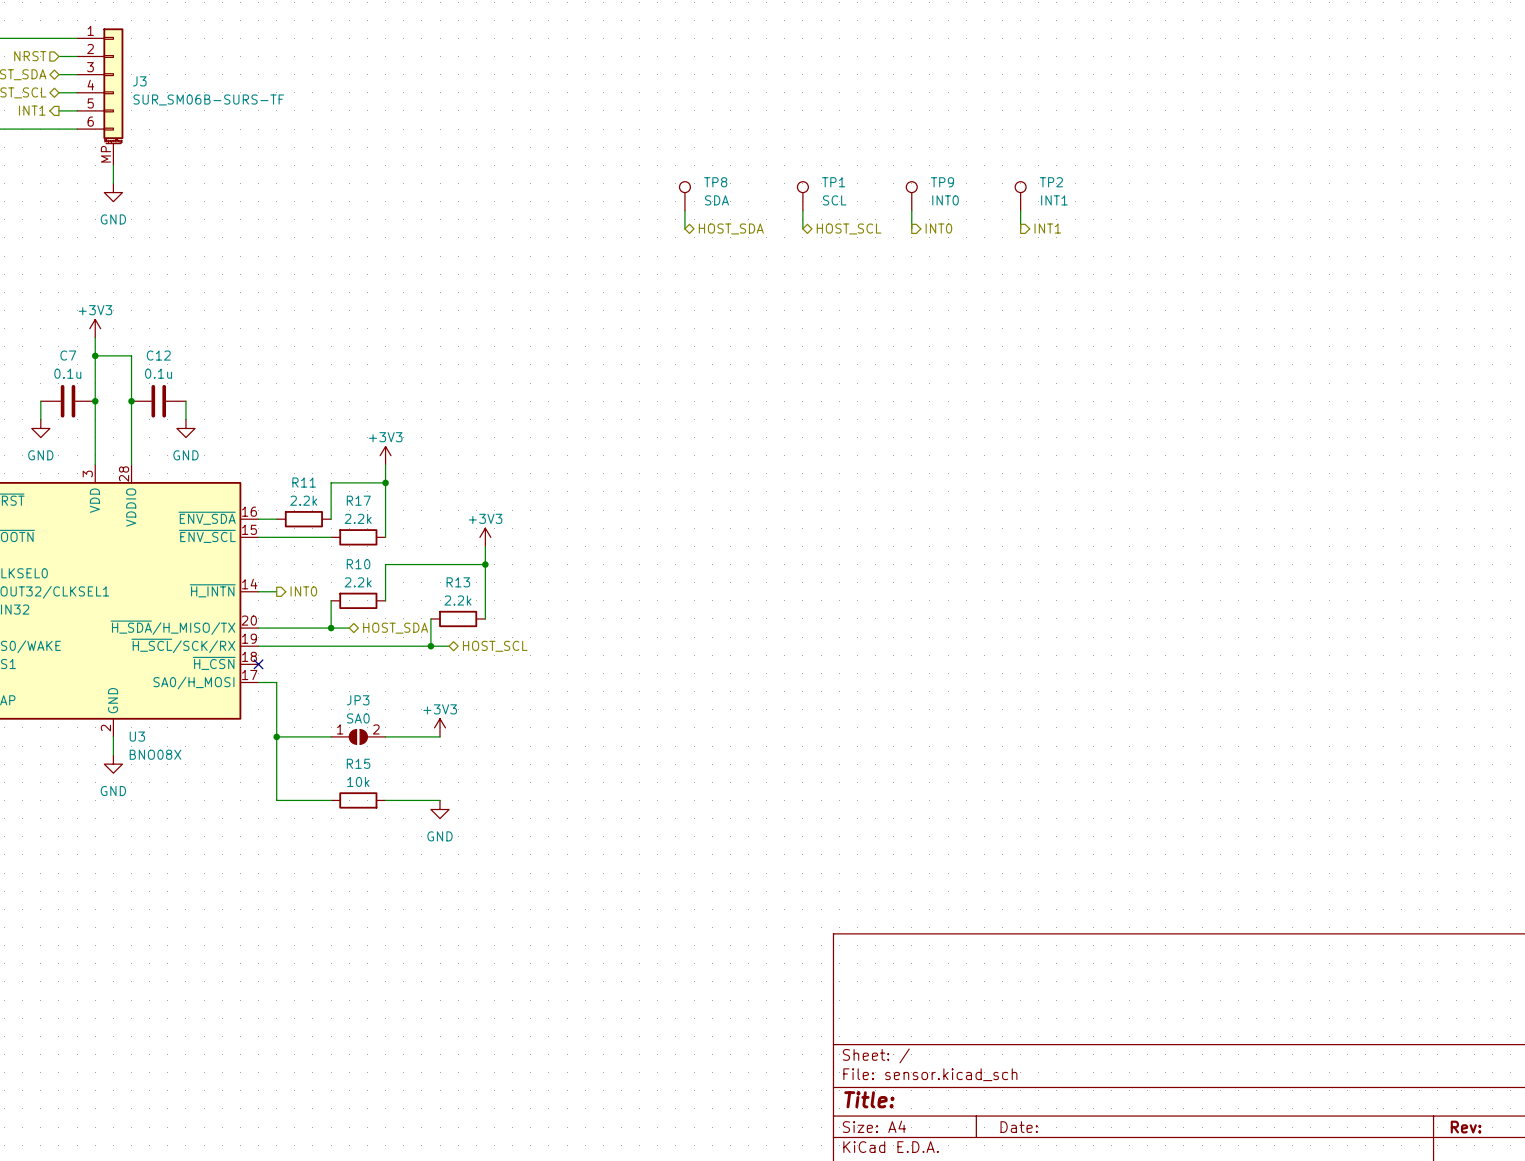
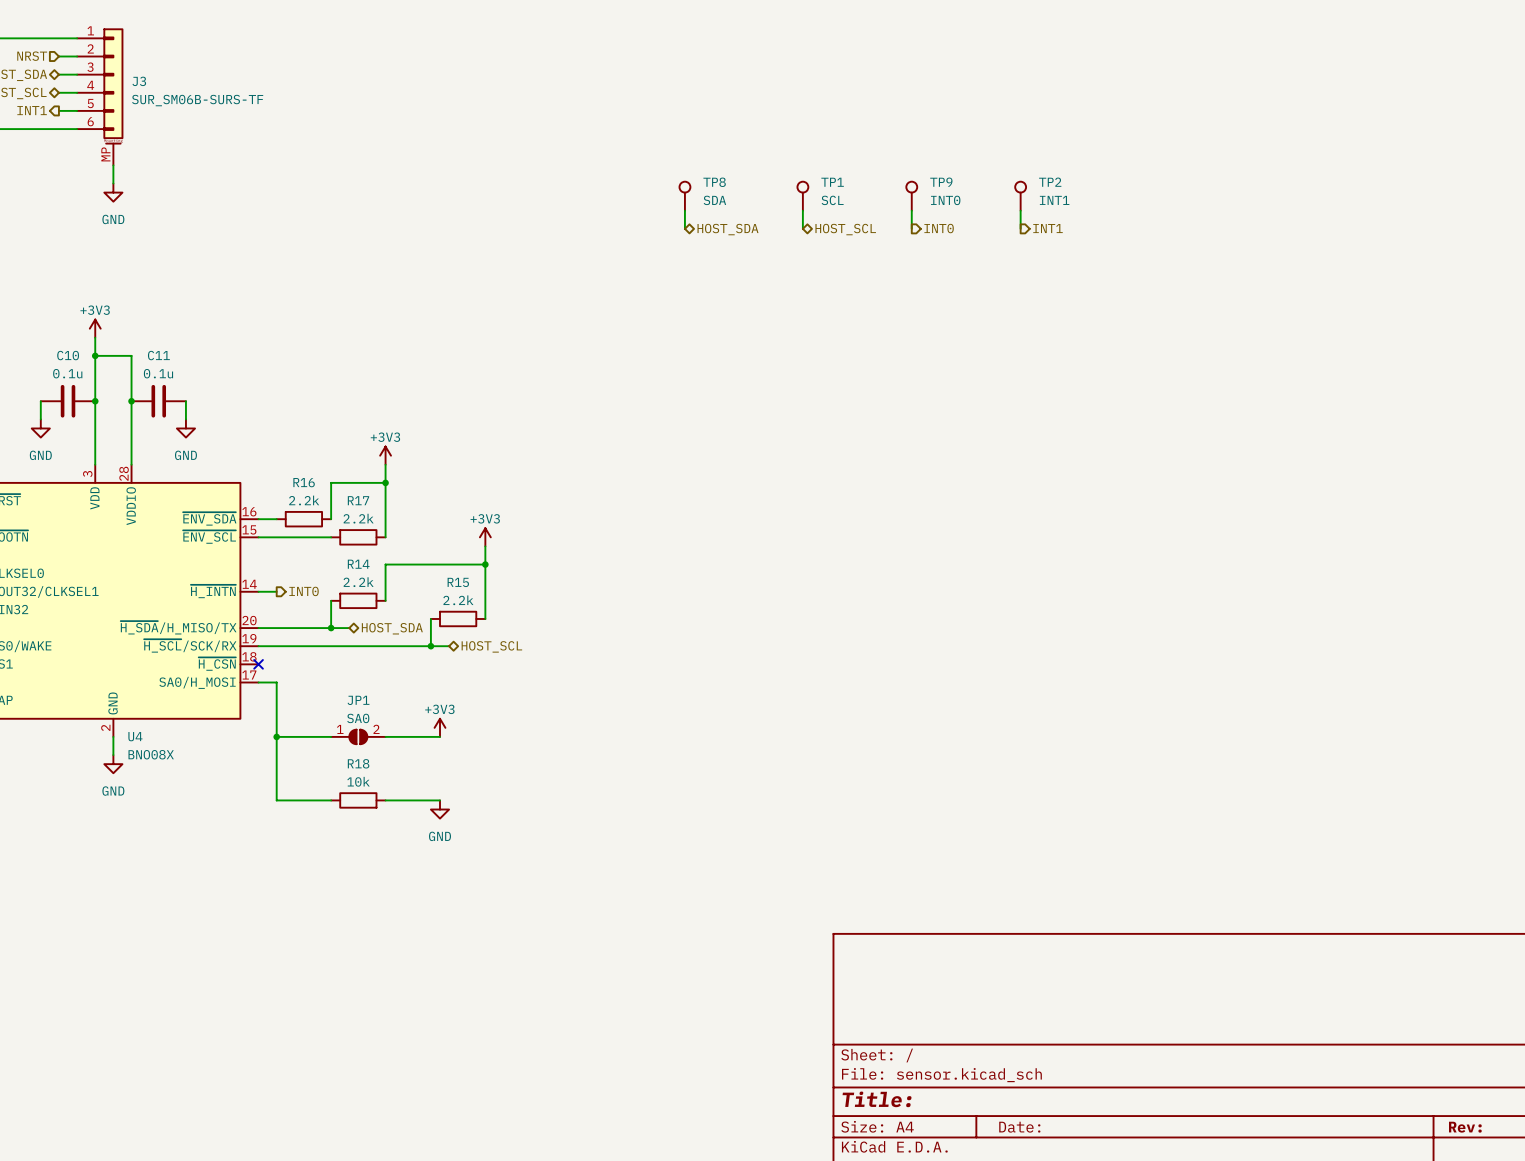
C7 name: C7 (68, 355) -> C10 (68, 355)
C12 name: C12 (158, 355) -> C11 (158, 355)
R11 name: R11 (304, 482) -> R16 (304, 482)
R10 name: R10 (358, 564) -> R14 (358, 564)
R13 name: R13 (458, 582) -> R15 (458, 582)
JP3 name: JP3 (358, 700) -> JP1 (358, 700)
U3 name: U3 (137, 736) -> U4 (135, 736)
R15 name: R15 (358, 763) -> R18 (358, 763)

